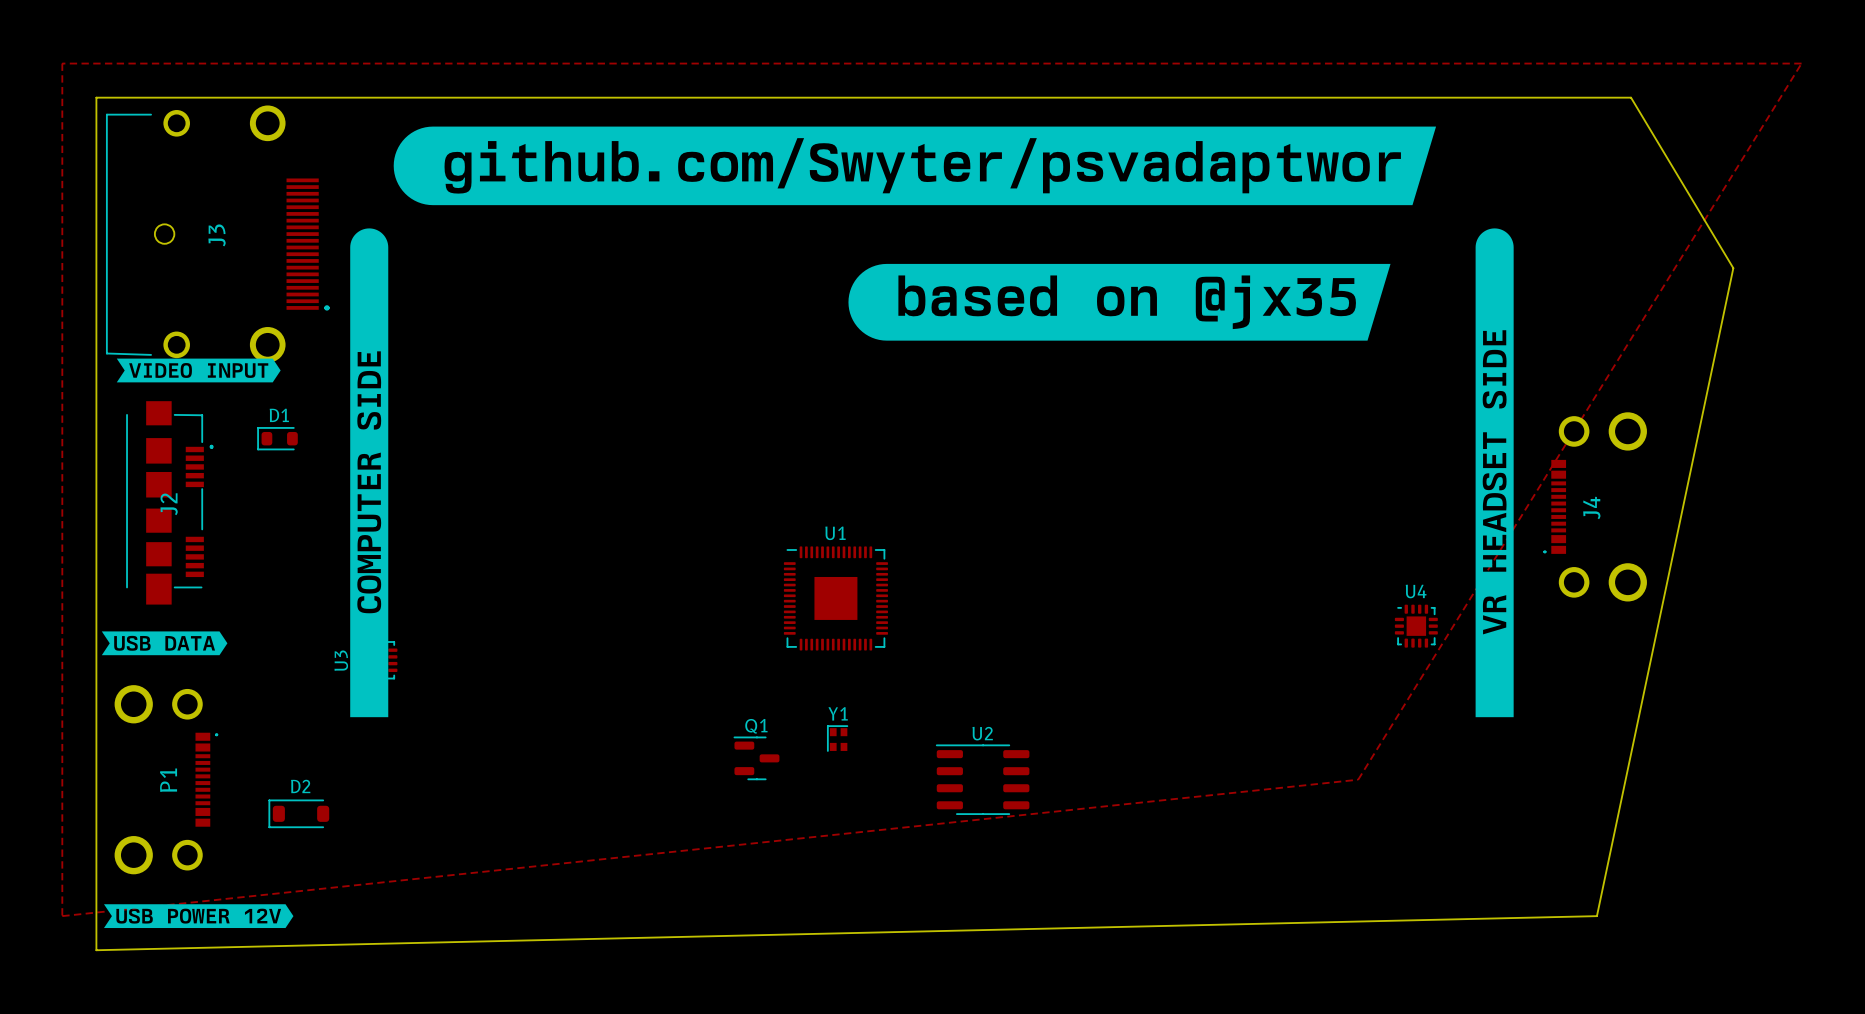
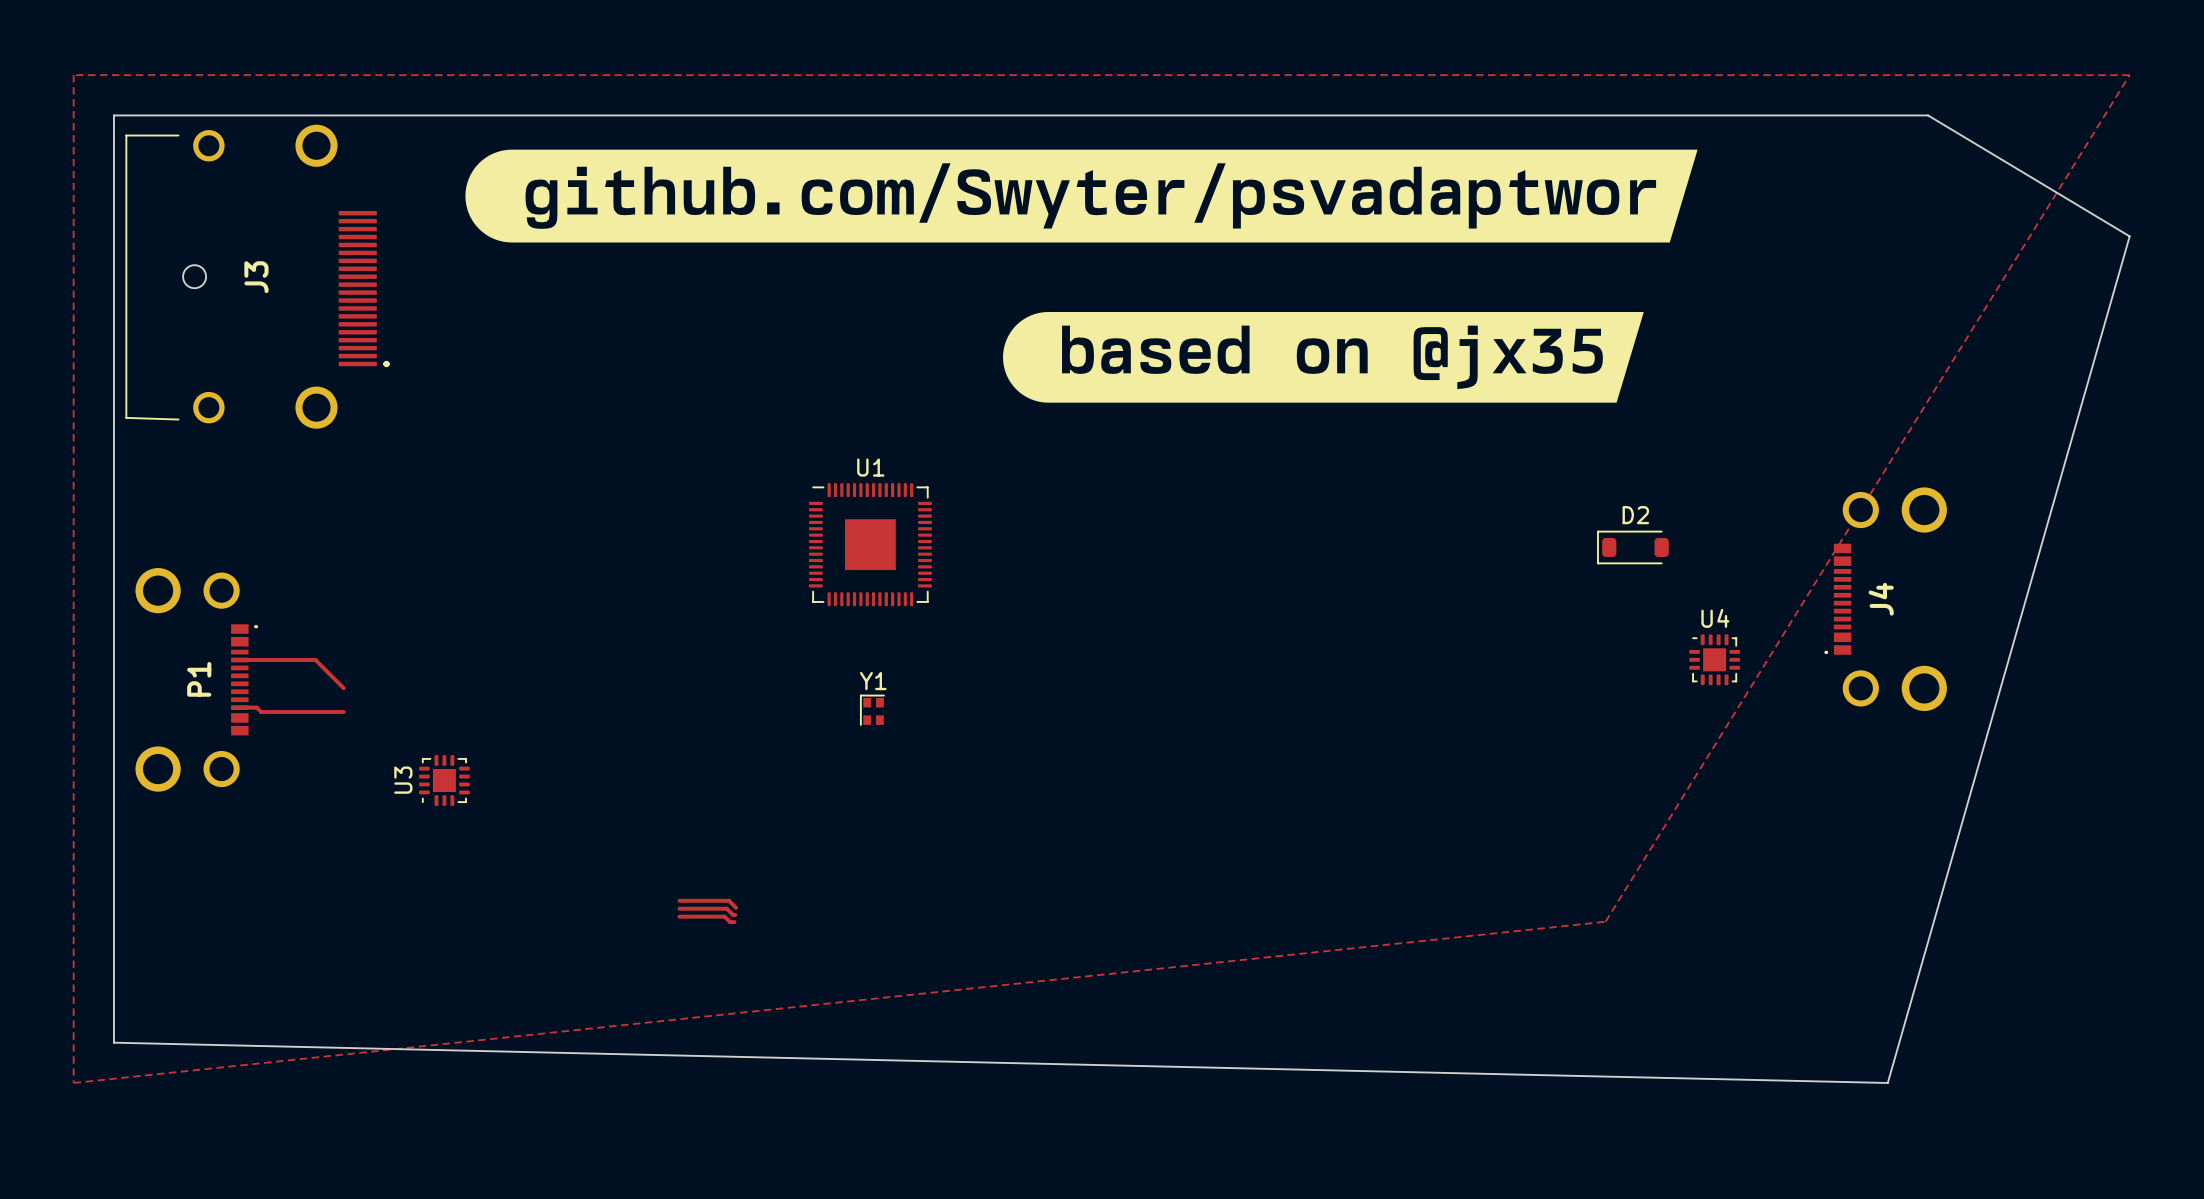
board edge: (1631, 97) (1733, 268) (1596, 916) (96, 950) (96, 882) -> (1928, 115) (2129, 236) (1887, 1082) (113, 1042)
drawing: [350, 228, 389, 718] -> none
drawing: [1475, 228, 1514, 718] -> none
drawing: [116, 358, 281, 383] -> none
D1: (277, 438) -> none
J2: (169, 502) -> none
top track: none -> (239, 660) (315, 660) (343, 688)
top track: none -> (239, 707) (256, 707) (261, 712) (343, 712)
U1 position: (835, 598) -> (870, 544)
U4 position: (1416, 626) -> (1714, 659)
drawing: [101, 631, 228, 656] -> none
Y1 position: (837, 738) -> (872, 710)
Q1: (756, 758) -> none
top track: none -> (679, 900) (729, 900) (736, 907)
top track: none -> (679, 908) (726, 908) (735, 914)
top track: none -> (679, 916) (724, 916) (730, 922) (734, 922)
P1 position: (166, 779) -> (196, 679)
U2: (982, 779) -> none
D2 position: (298, 813) -> (1632, 547)
drawing: [103, 904, 294, 929] -> none

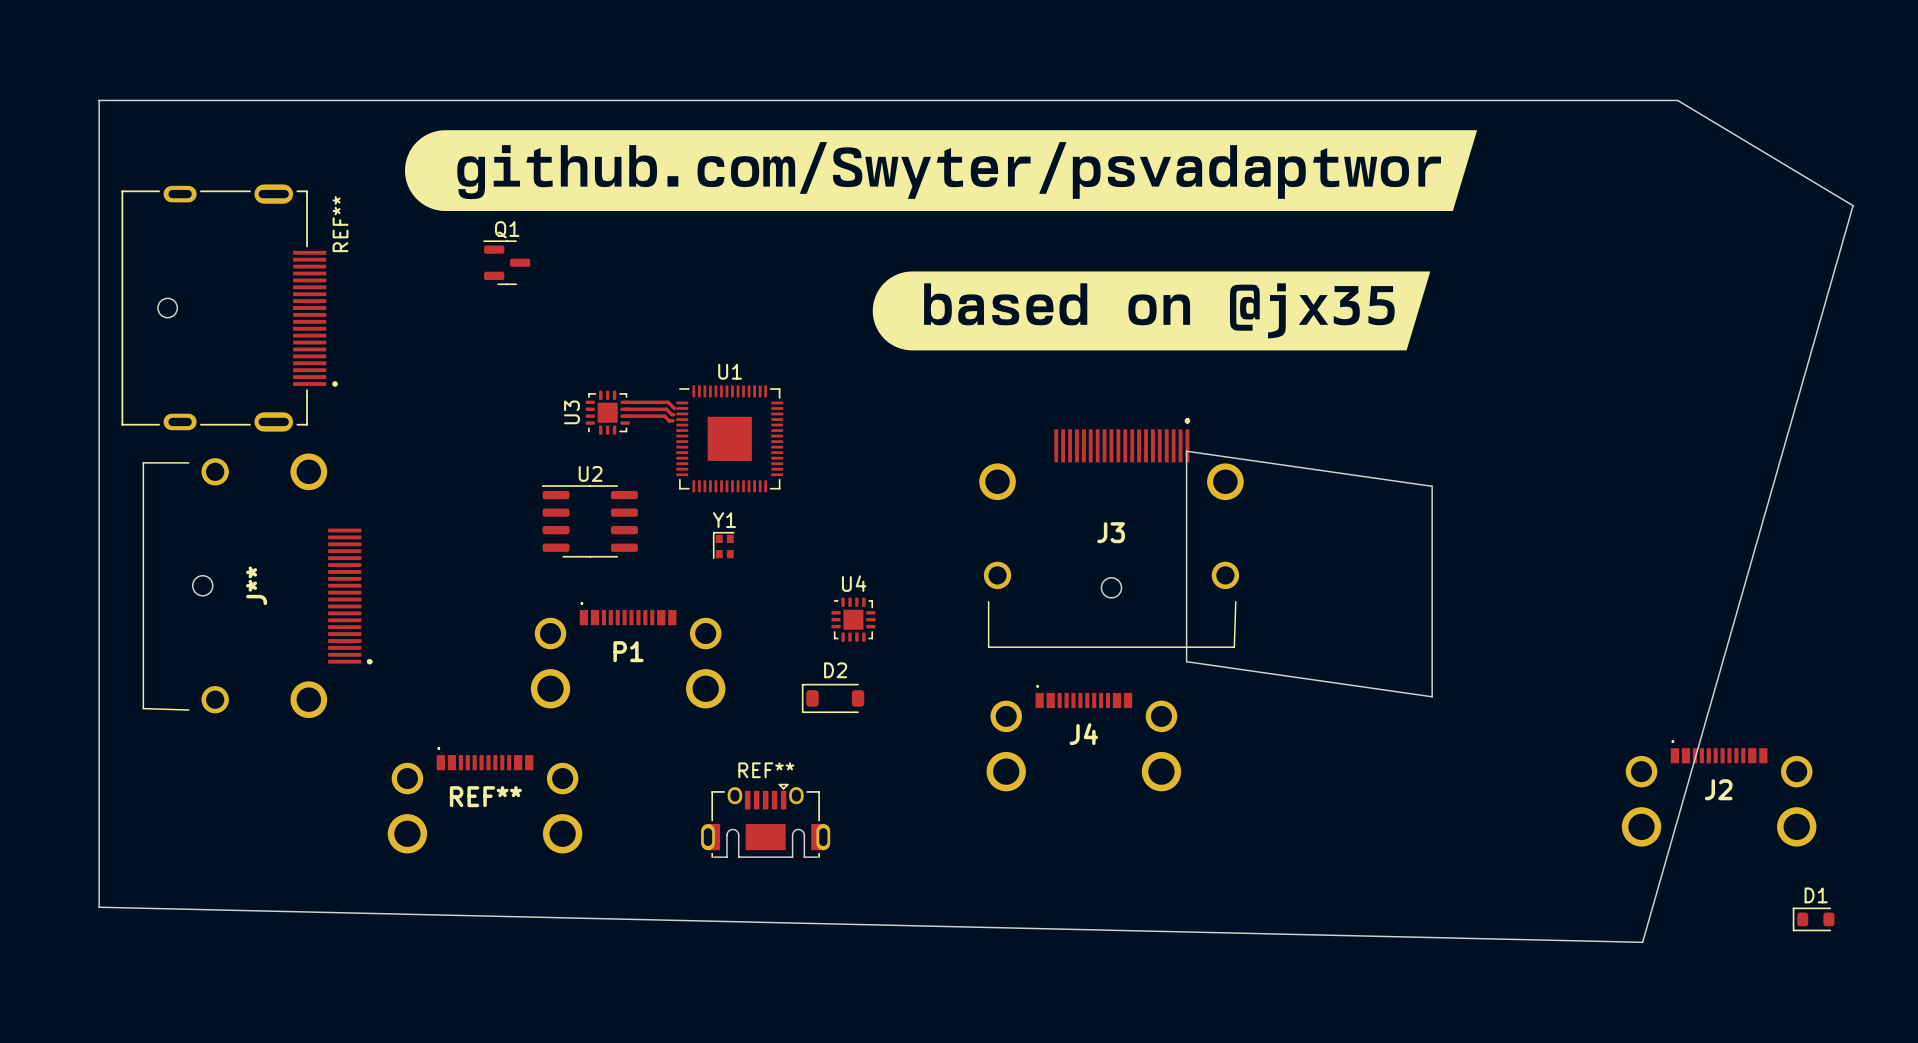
top zone outline: (73, 75) (73, 1082) (1605, 921) (2129, 75) (73, 75) -> none
J3 rotation: 0° (257, 276) -> 90° counterclockwise (1111, 532)
J3 position: (257, 276) -> (1111, 532)
Q1: none -> (506, 262)
REF**: none -> (229, 308)
top track: none -> (625, 402) (668, 402) (674, 408)
top track: none -> (625, 409) (666, 409) (673, 414)
top track: none -> (625, 416) (664, 416) (669, 420) (673, 420)
board edge: none -> (1186, 451) (1186, 661) (1432, 696) (1432, 486) (1186, 451)
U1 position: (870, 544) -> (729, 438)
D2 position: (1632, 547) -> (833, 698)
U2: none -> (589, 521)
J4 rotation: 0° (1885, 599) -> 90° clockwise (1083, 738)
J4 position: (1885, 599) -> (1083, 738)
U4 position: (1714, 659) -> (853, 619)
top track: (239, 660) (315, 660) (343, 688) -> none
J**: none -> (257, 585)
P1 rotation: 0° (196, 679) -> 90° counterclockwise (628, 655)
P1 position: (196, 679) -> (628, 655)
top track: (239, 707) (256, 707) (261, 712) (343, 712) -> none
Y1 position: (872, 710) -> (723, 545)
U3 position: (444, 780) -> (607, 412)
top track: (679, 900) (729, 900) (736, 907) -> none
top track: (679, 908) (726, 908) (735, 914) -> none
J2: none -> (1719, 793)
top track: (679, 916) (724, 916) (730, 922) (734, 922) -> none
REF**: none -> (485, 800)
REF**: none -> (765, 820)
D1: none -> (1813, 919)

